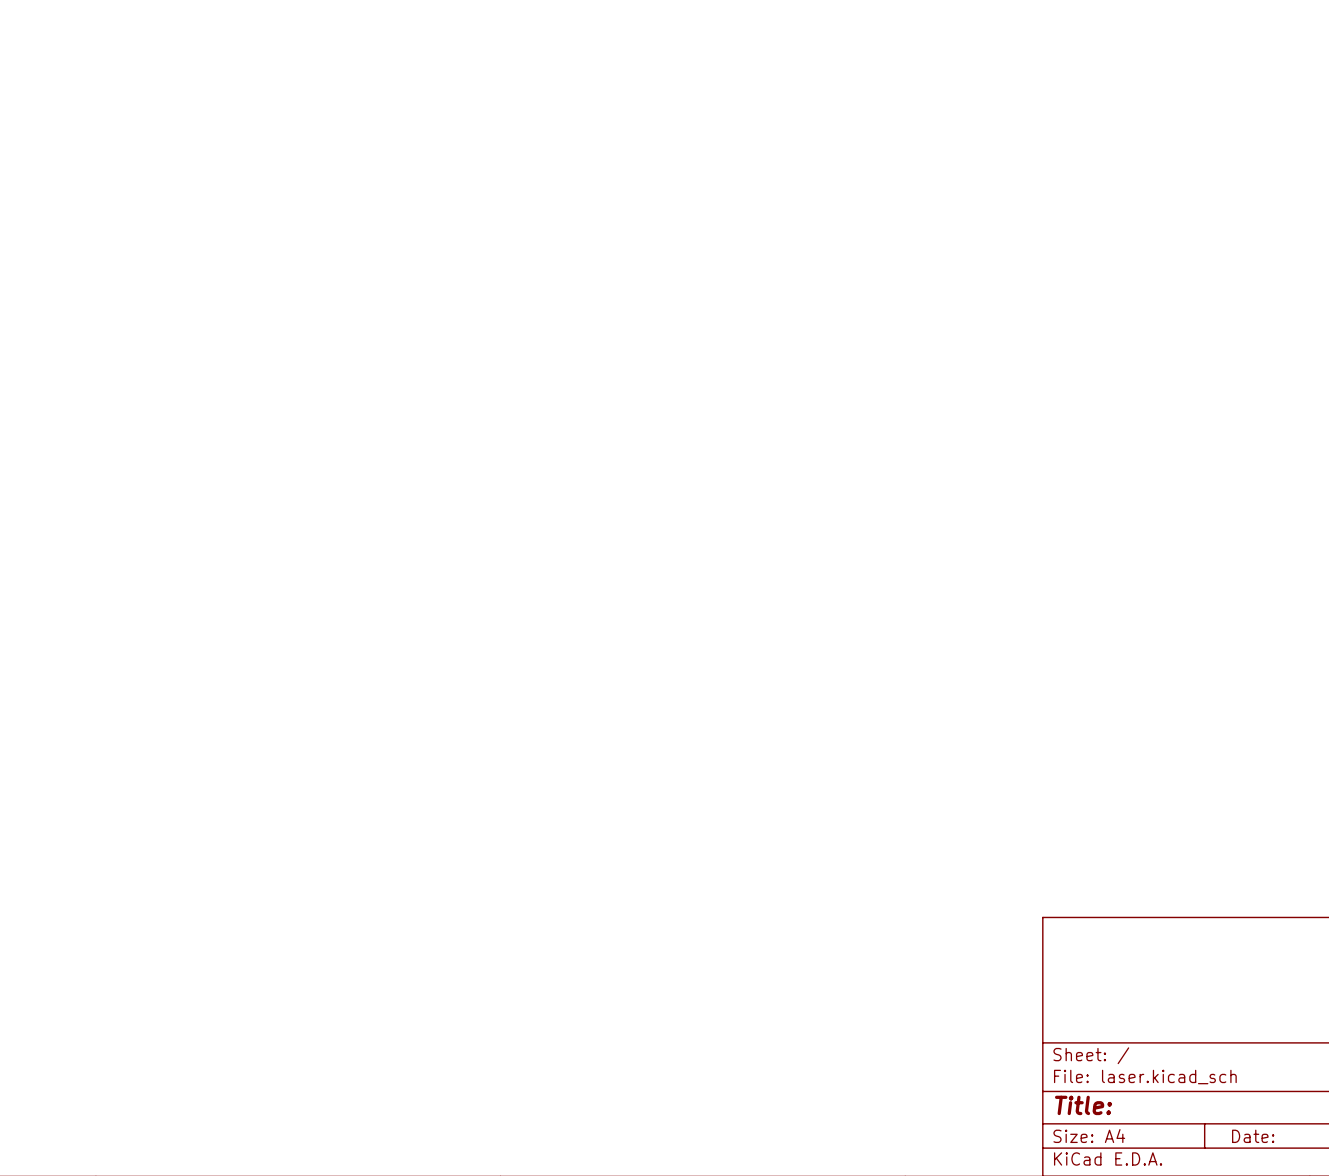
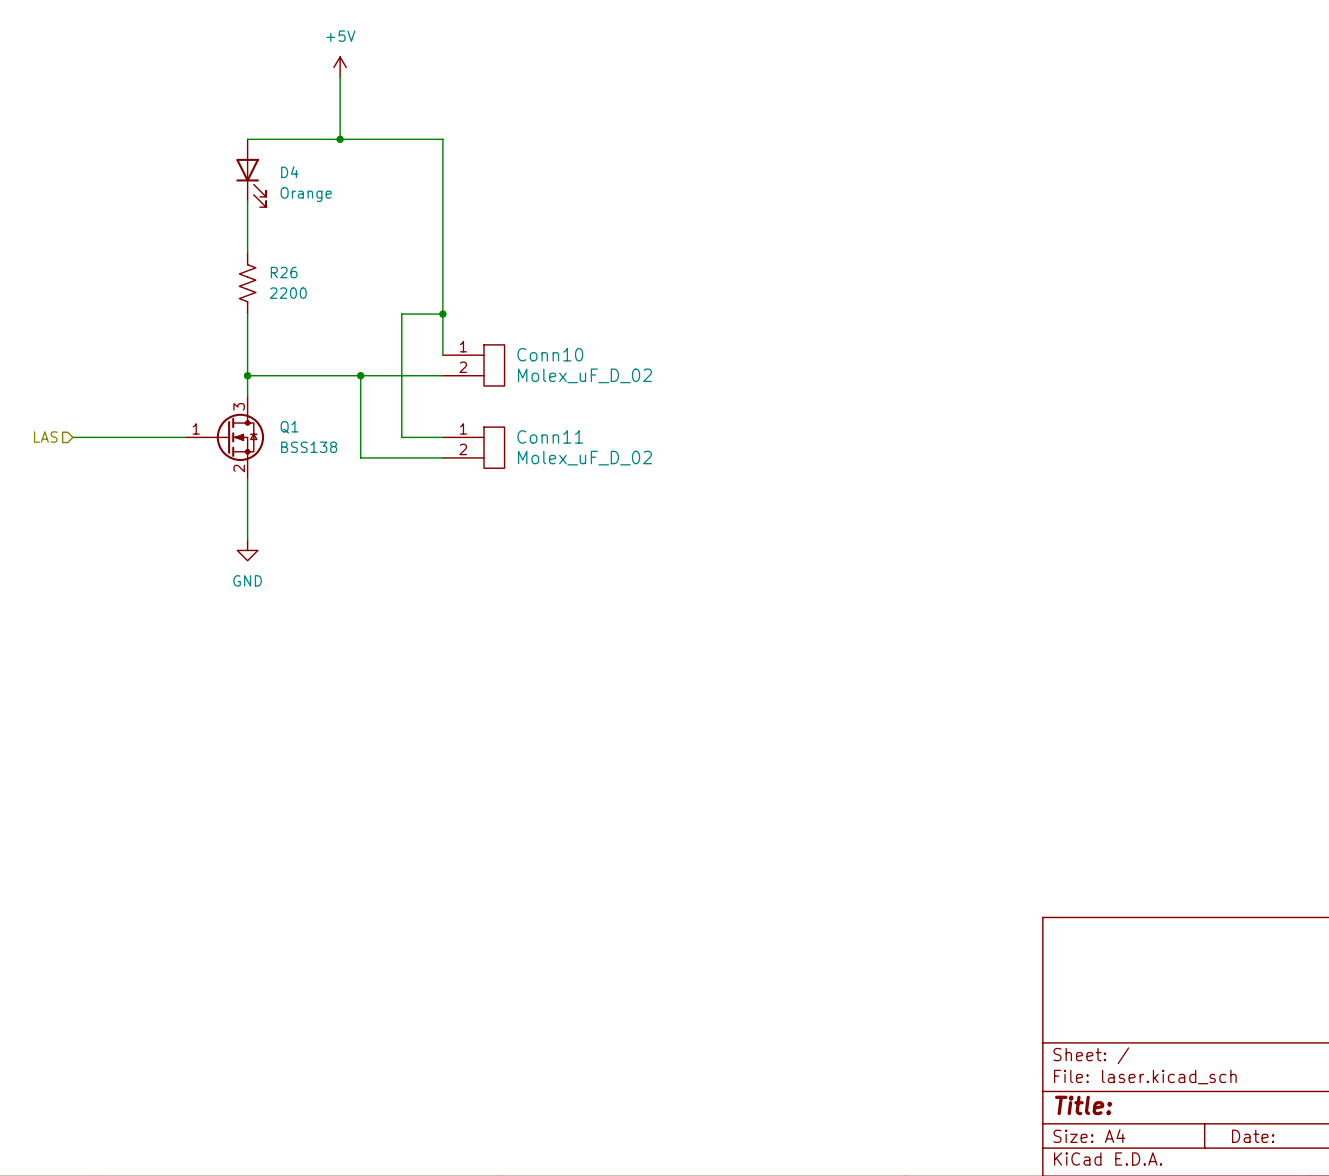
power symbol: none -> +5V (340, 67)
wire: none -> (340, 77) (340, 139)
wire: none -> (247, 139) (442, 139) (442, 355)
junction: none -> (340, 139)
D4: none -> Orange (251, 173)
wire: none -> (247, 201) (247, 252)
R26: none -> 2200 (247, 283)
wire: none -> (247, 314) (247, 396)
wire: none -> (442, 314) (401, 314) (401, 437) (442, 437)
junction: none -> (442, 314)
Conn10: none -> Molex_uF_D_02 (473, 365)
wire: none -> (247, 375) (442, 375)
junction: none -> (247, 375)
wire: none -> (360, 375) (360, 457) (442, 457)
junction: none -> (360, 375)
hierarchical label: none -> LAS (45, 437)
wire: none -> (72, 437) (185, 437)
Q1: none -> BSS138 (224, 437)
Conn11: none -> Molex_uF_D_02 (473, 447)
wire: none -> (247, 478) (247, 540)
power symbol: none -> GND (247, 550)

